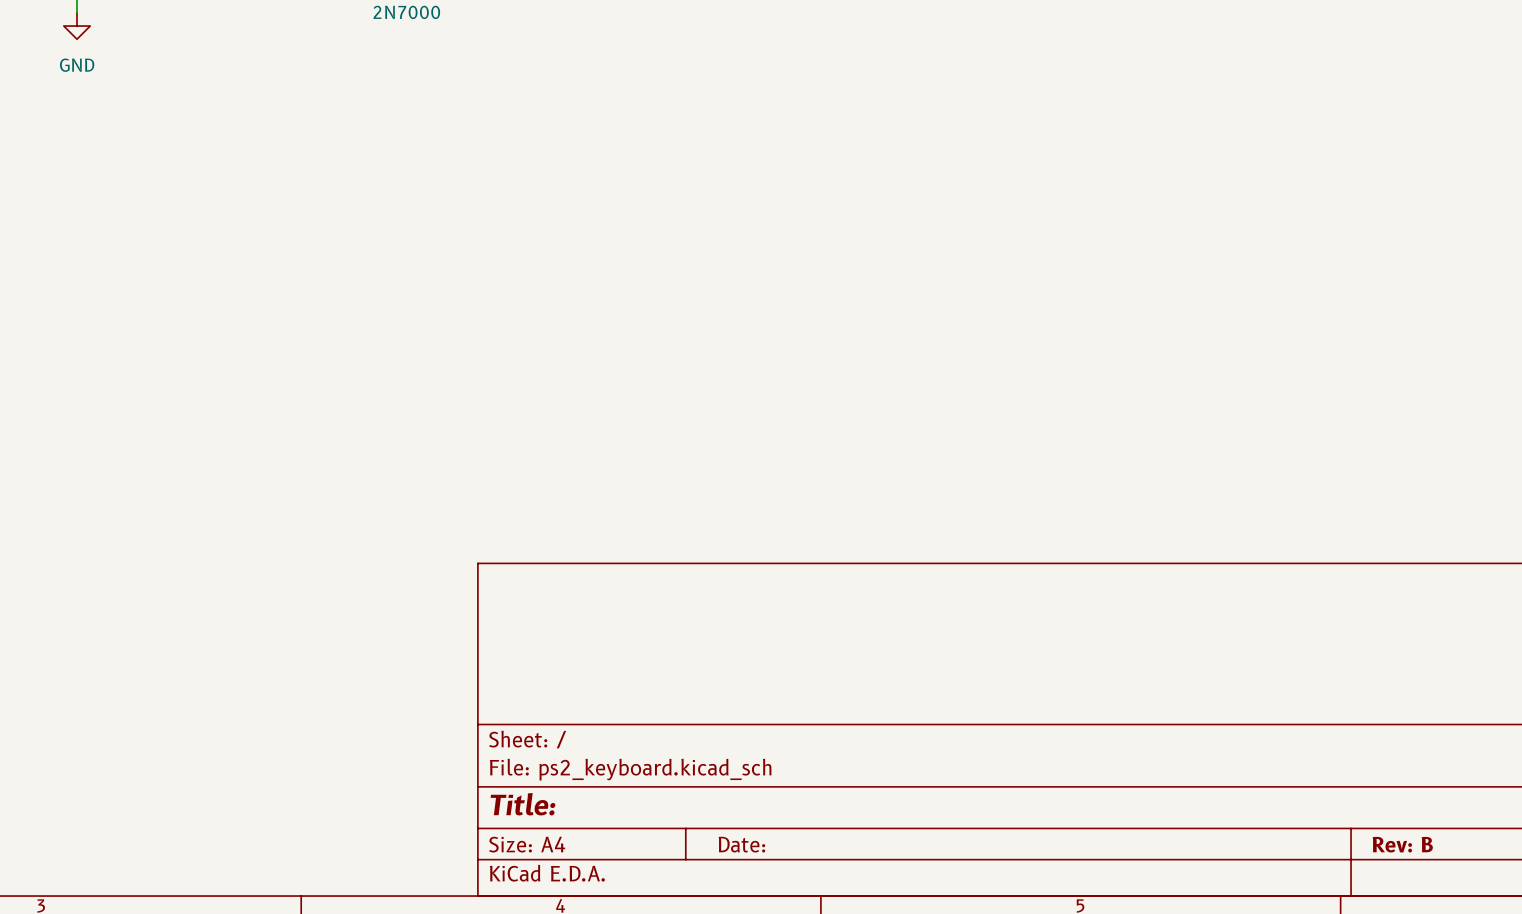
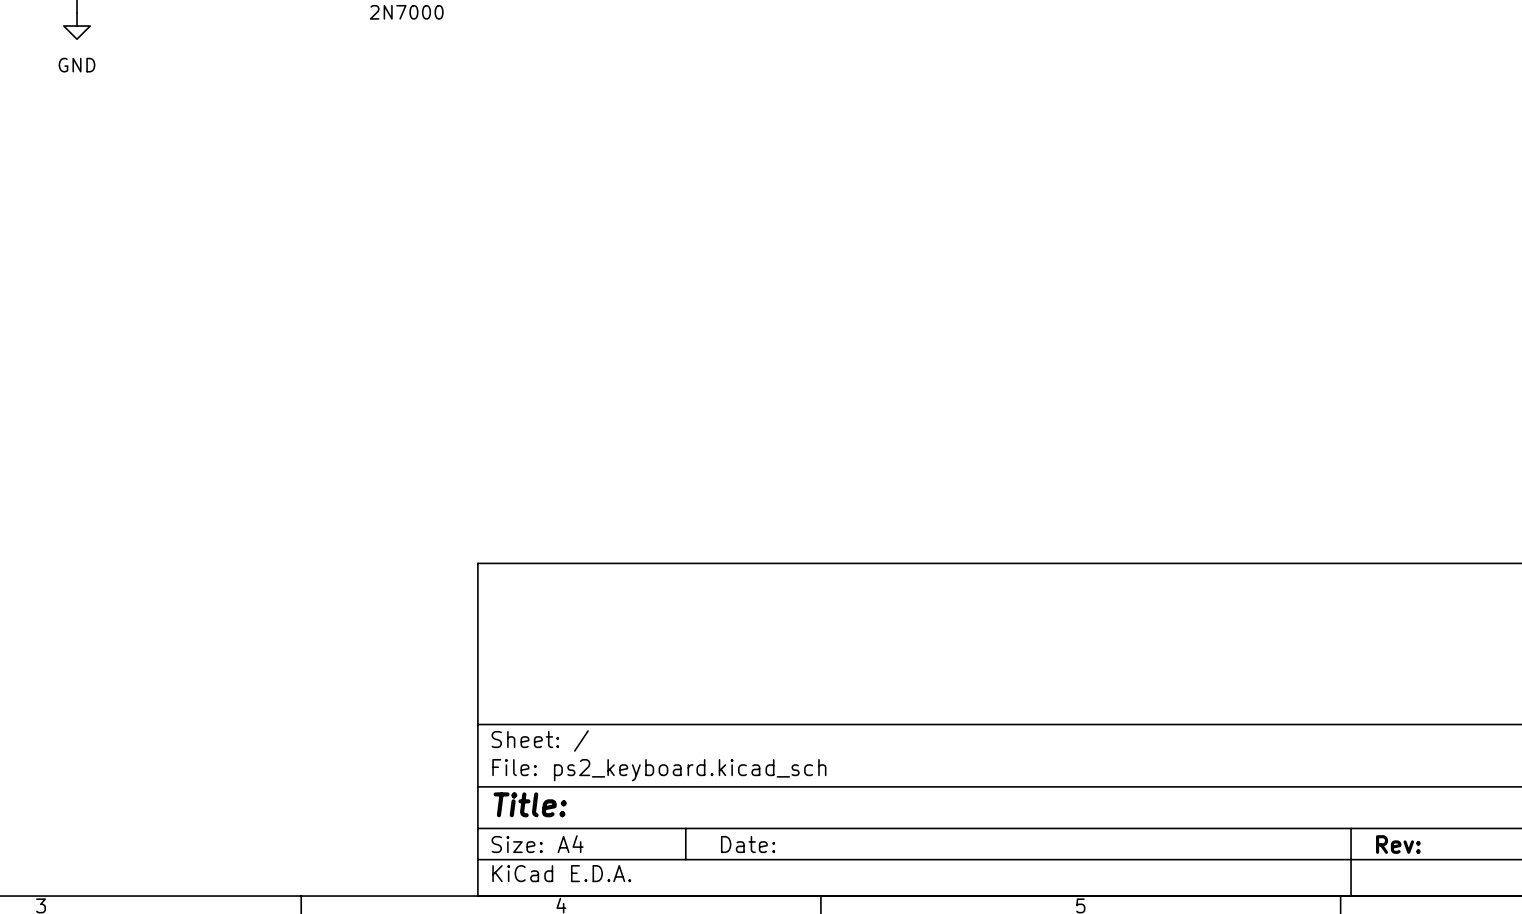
title block: Rev: B (1402, 844) -> Rev: (1398, 844)

